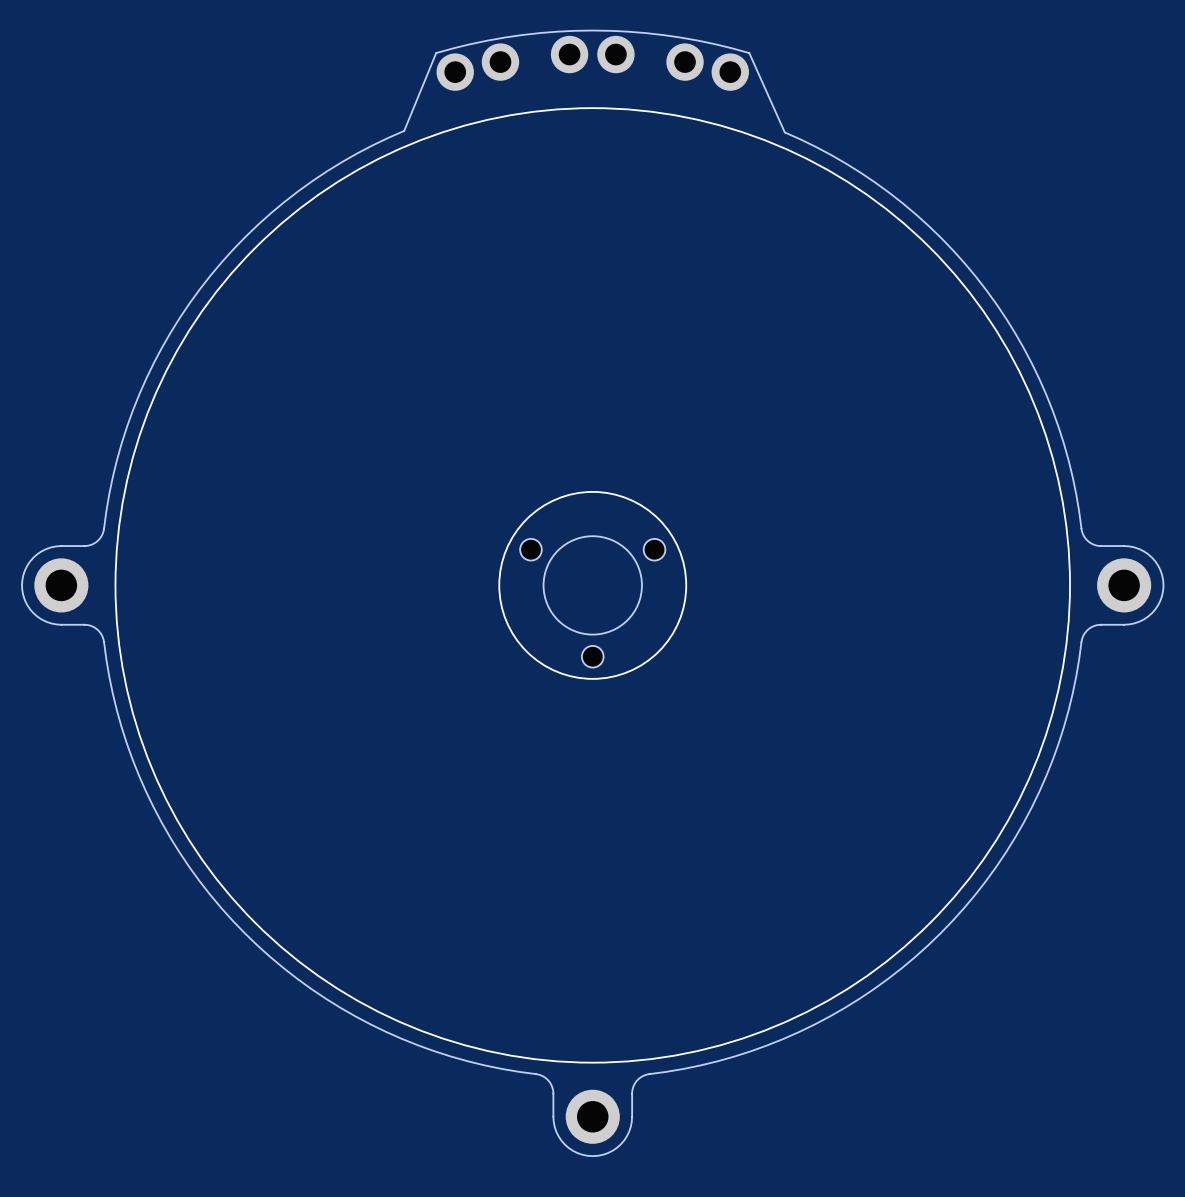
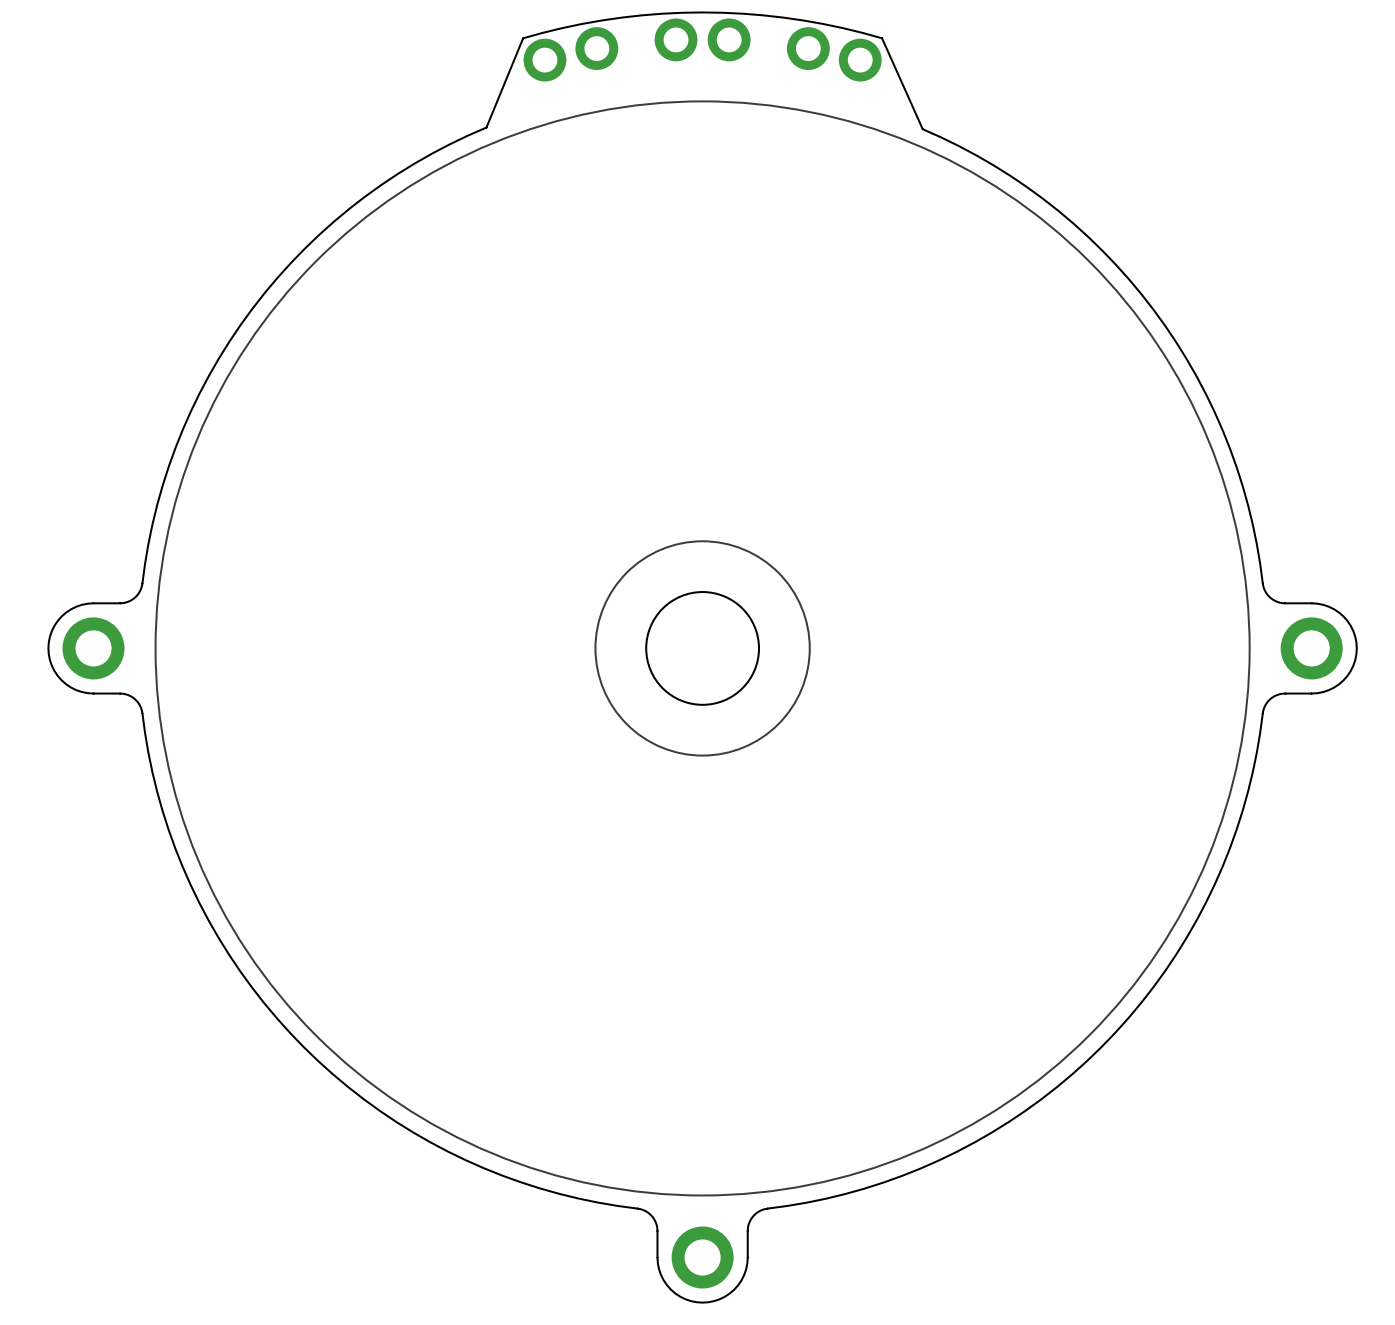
part: (530, 549) -> none
part: (654, 549) -> none
part: (592, 656) -> none

